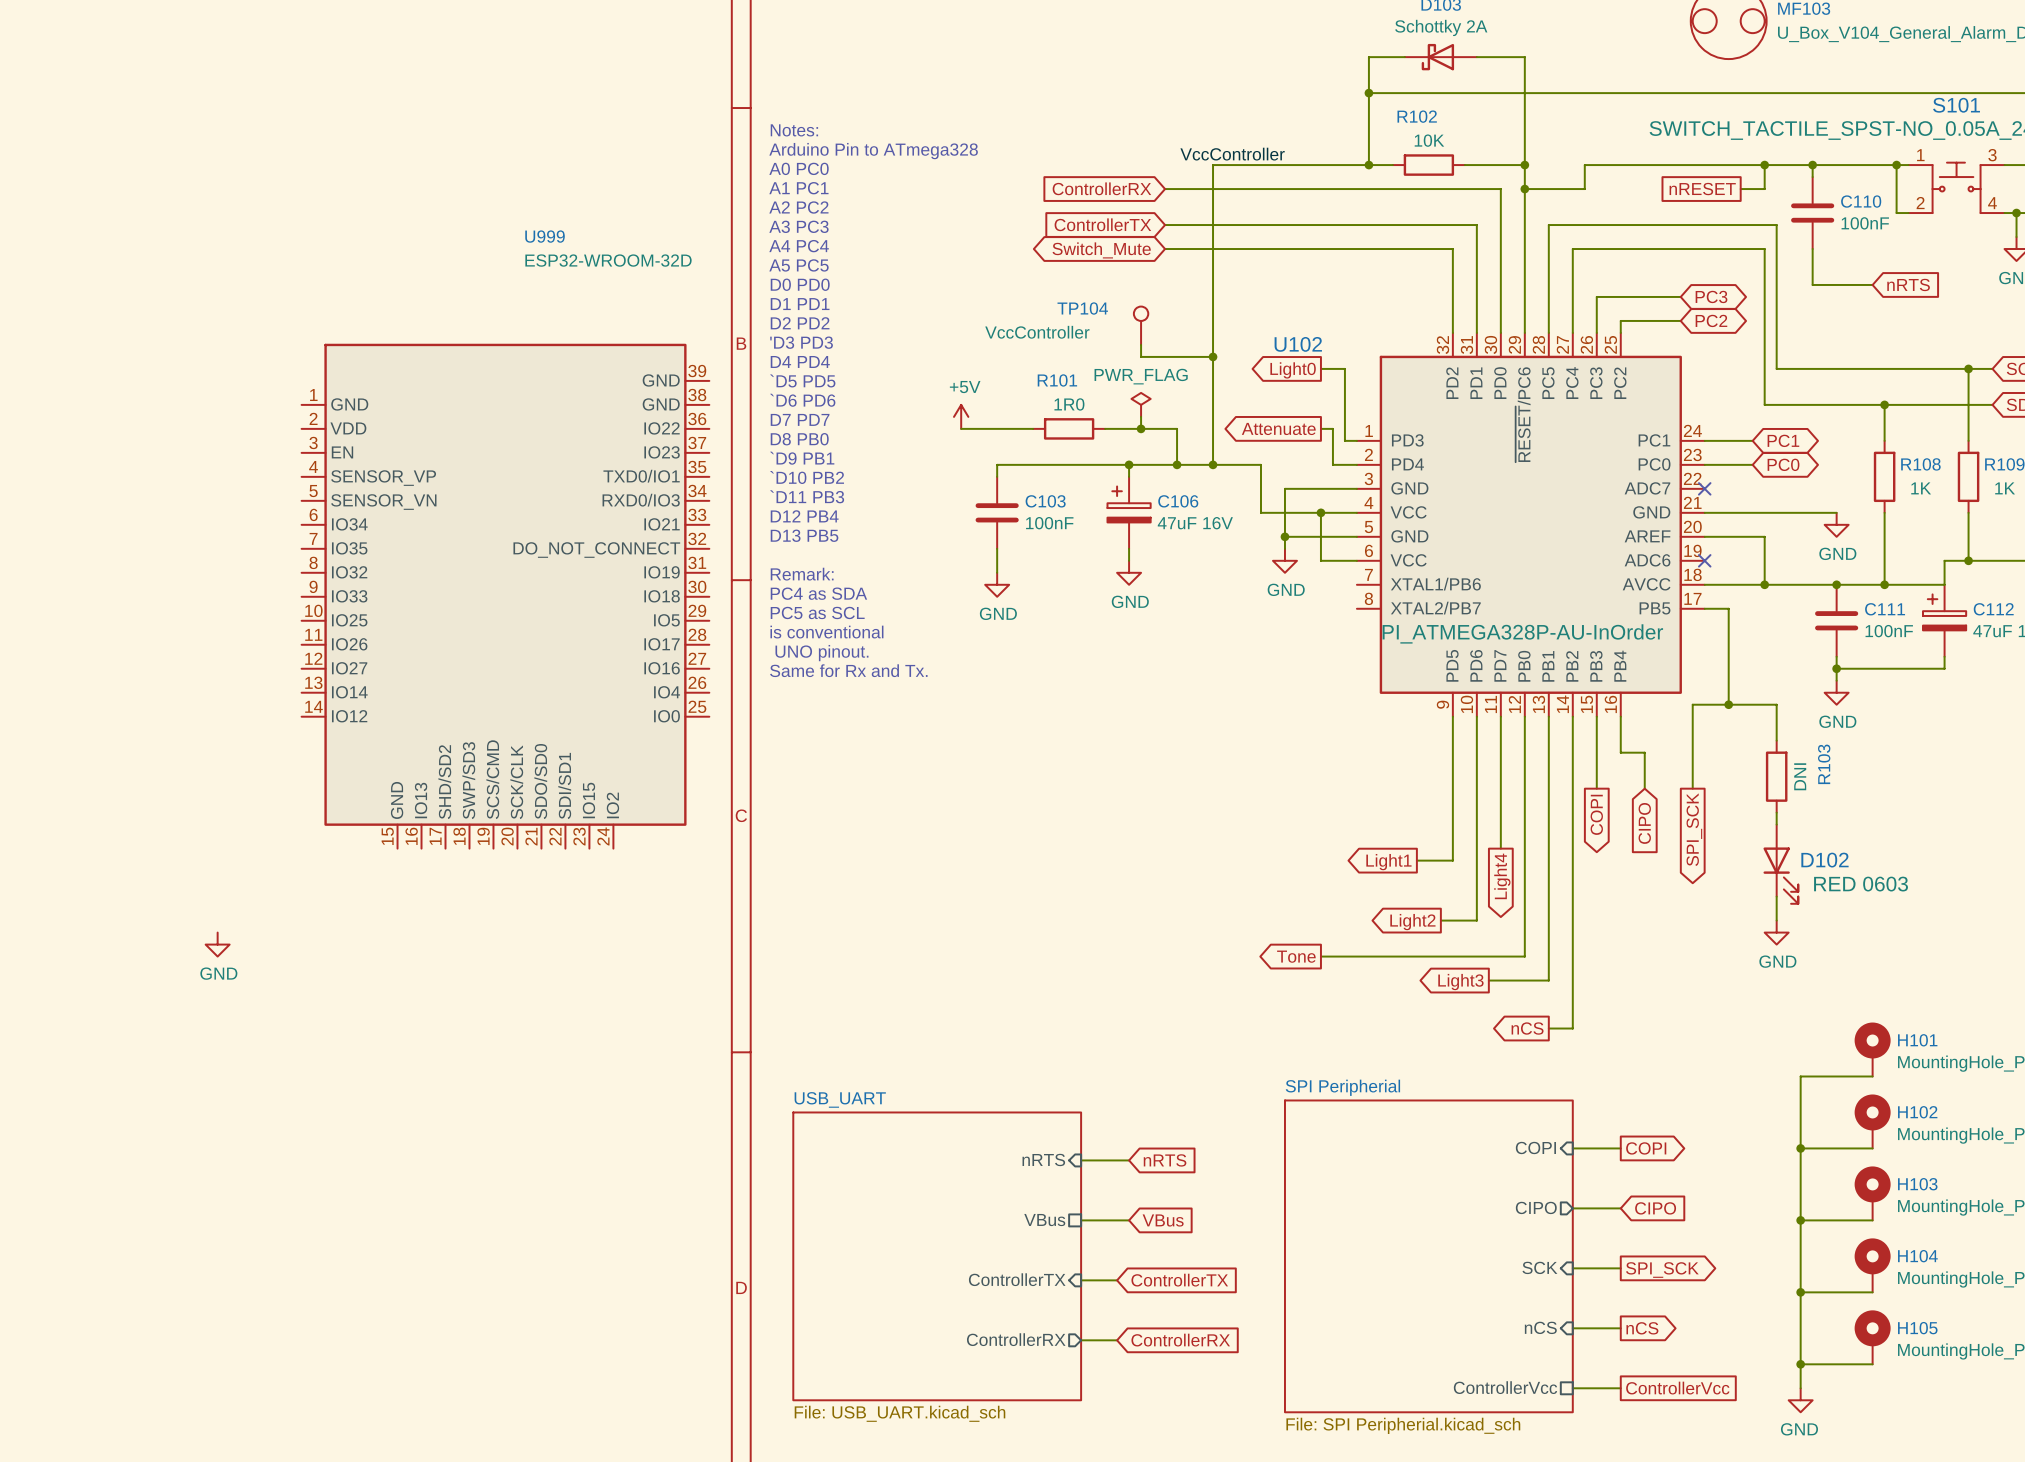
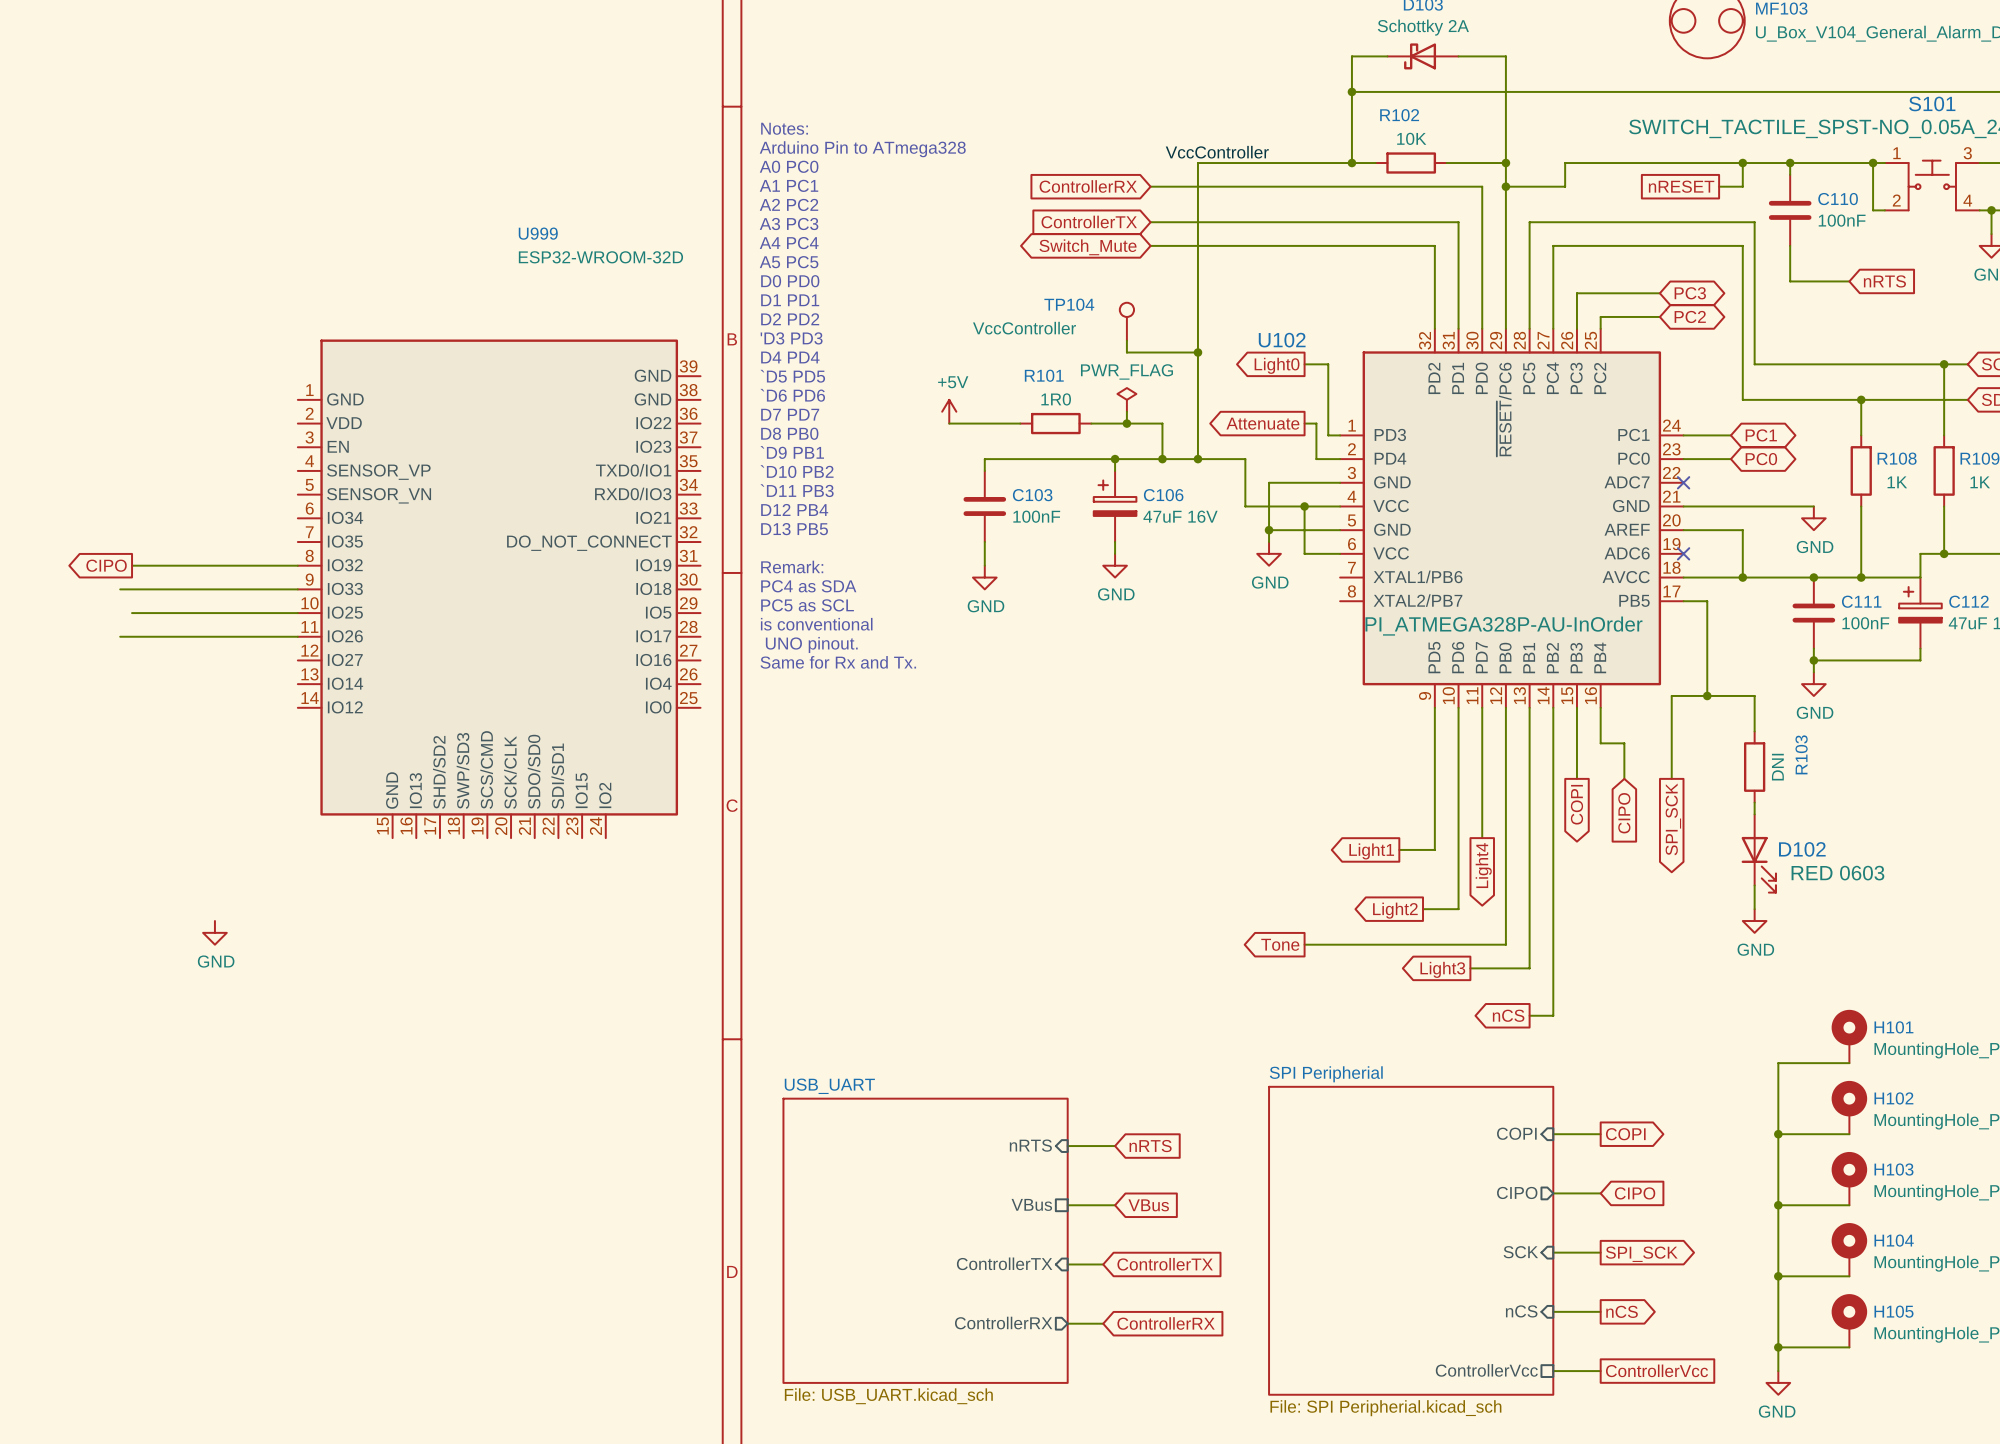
global label: none -> CIPO (106, 565)
wire: none -> (132, 565) (297, 565)
wire: none -> (120, 589) (297, 589)
wire: none -> (132, 613) (297, 613)
wire: none -> (120, 636) (297, 636)

